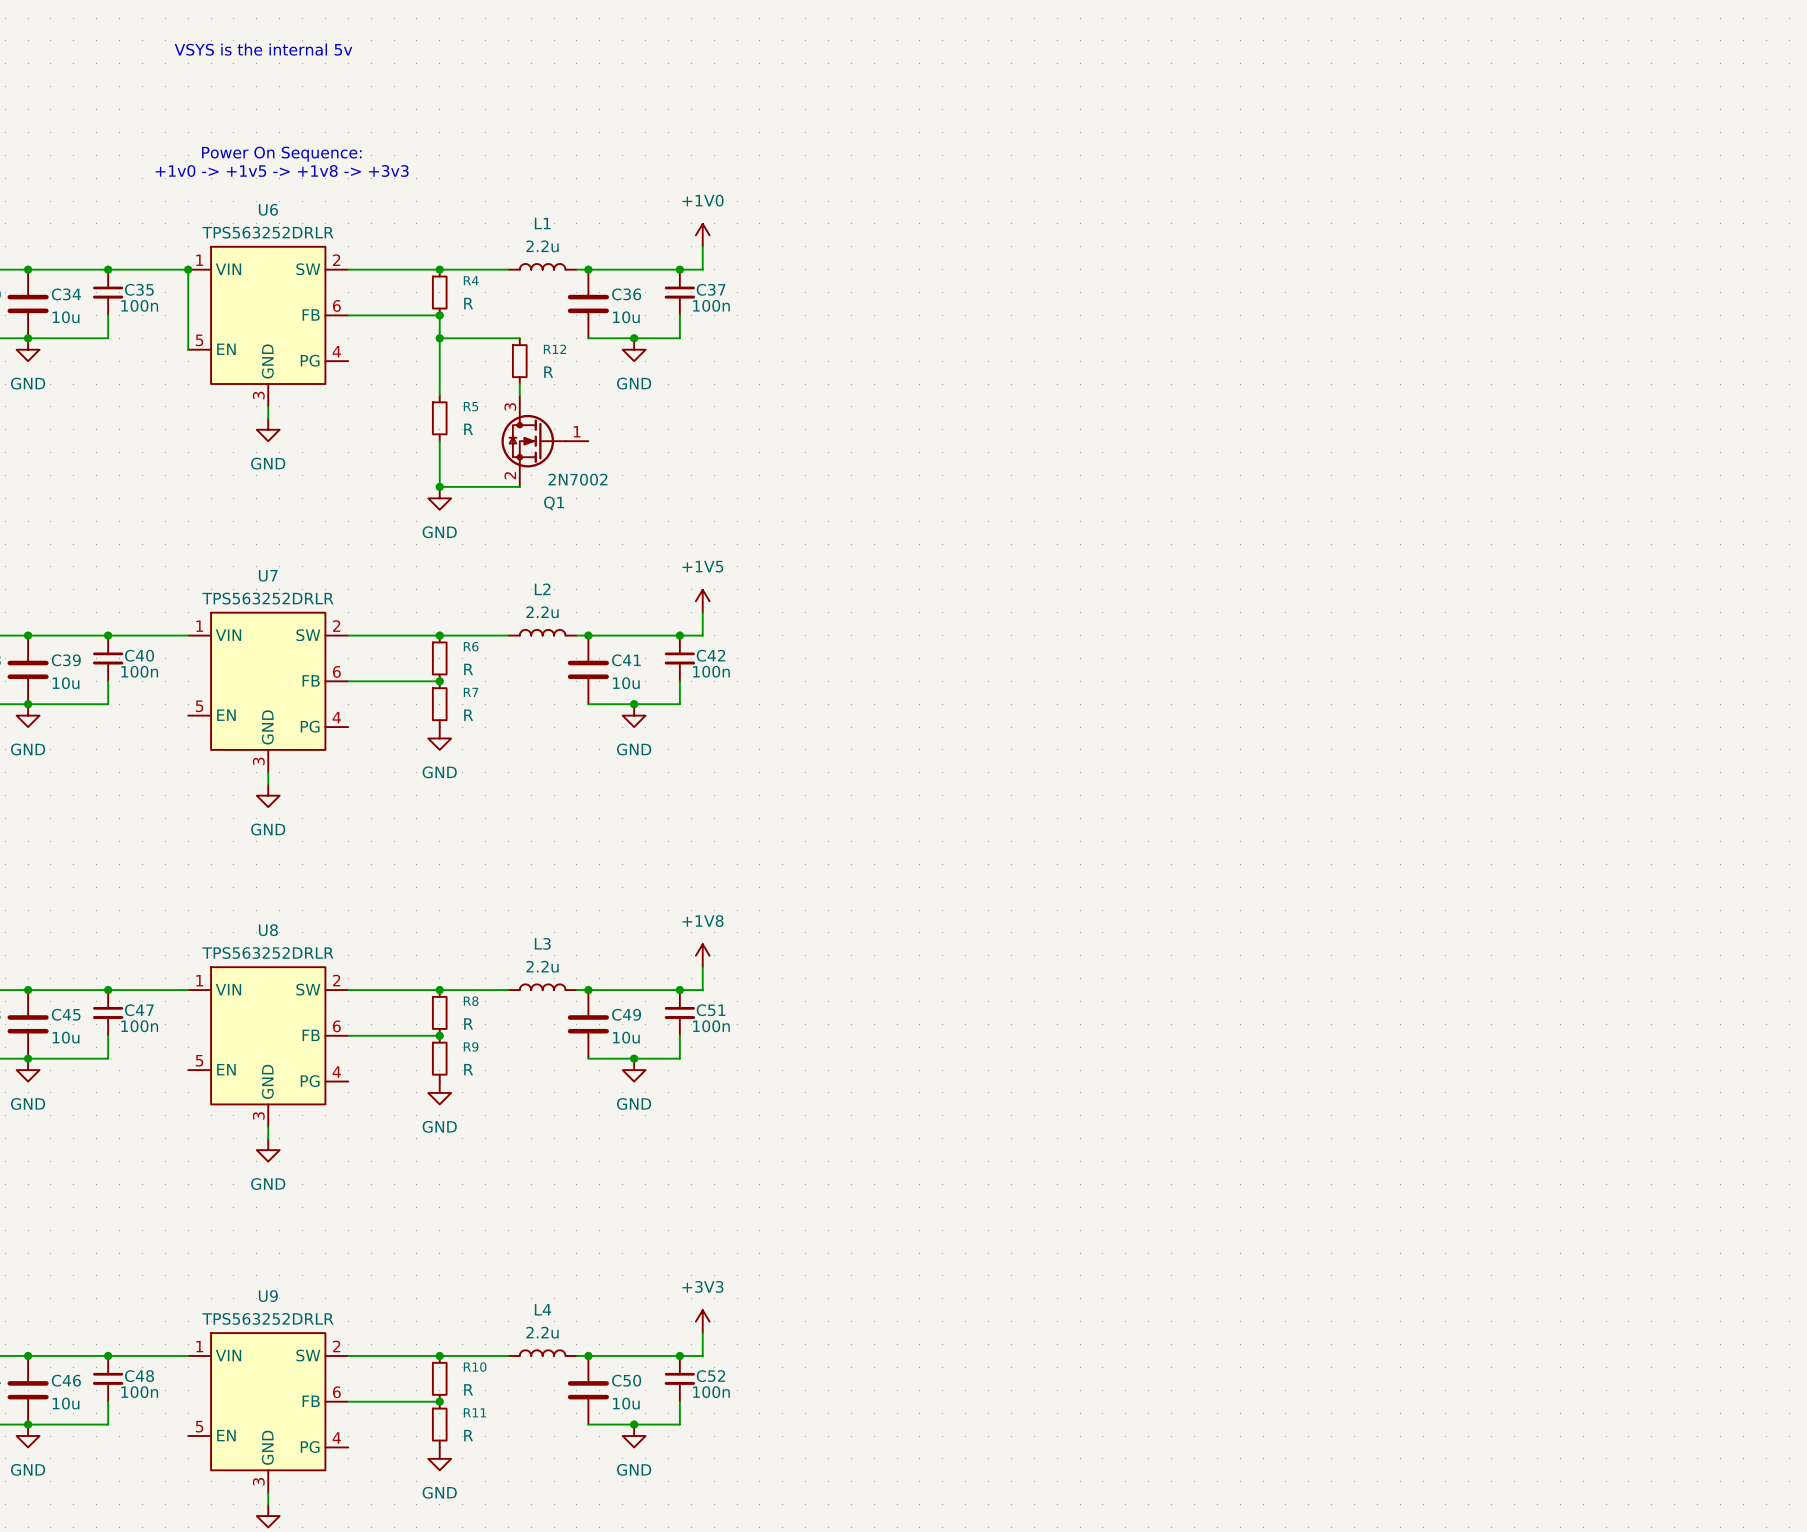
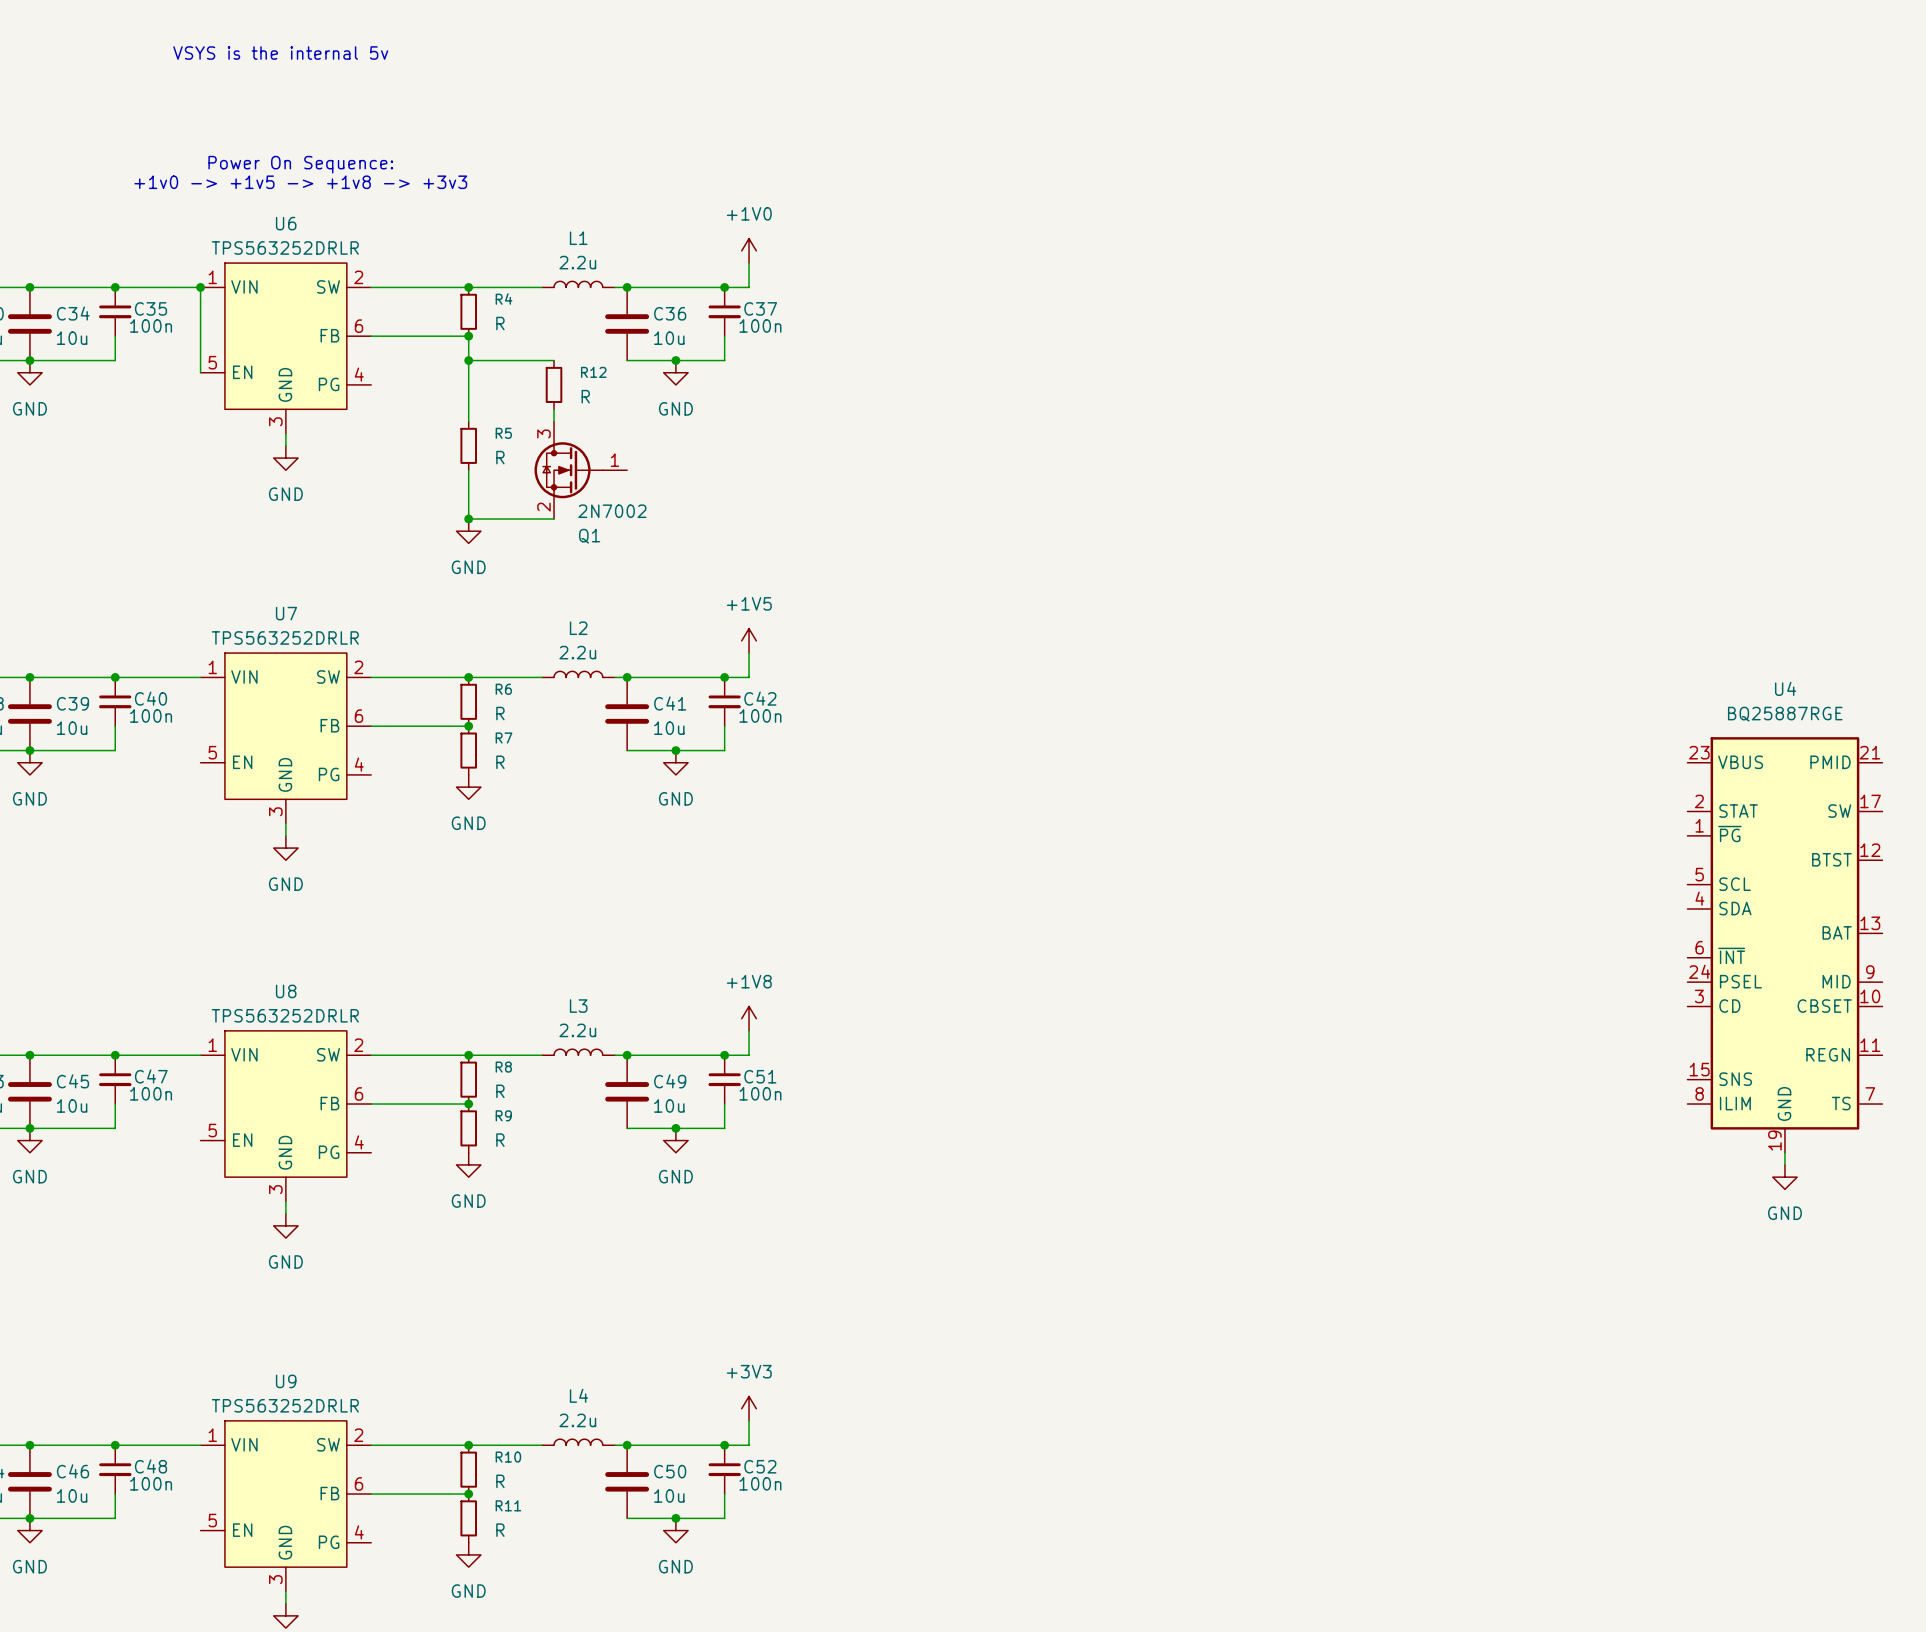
U4: none -> BQ25887RGE (1784, 944)
wire: none -> (1784, 1152) (1784, 1164)
power symbol: none -> GND (1784, 1177)

